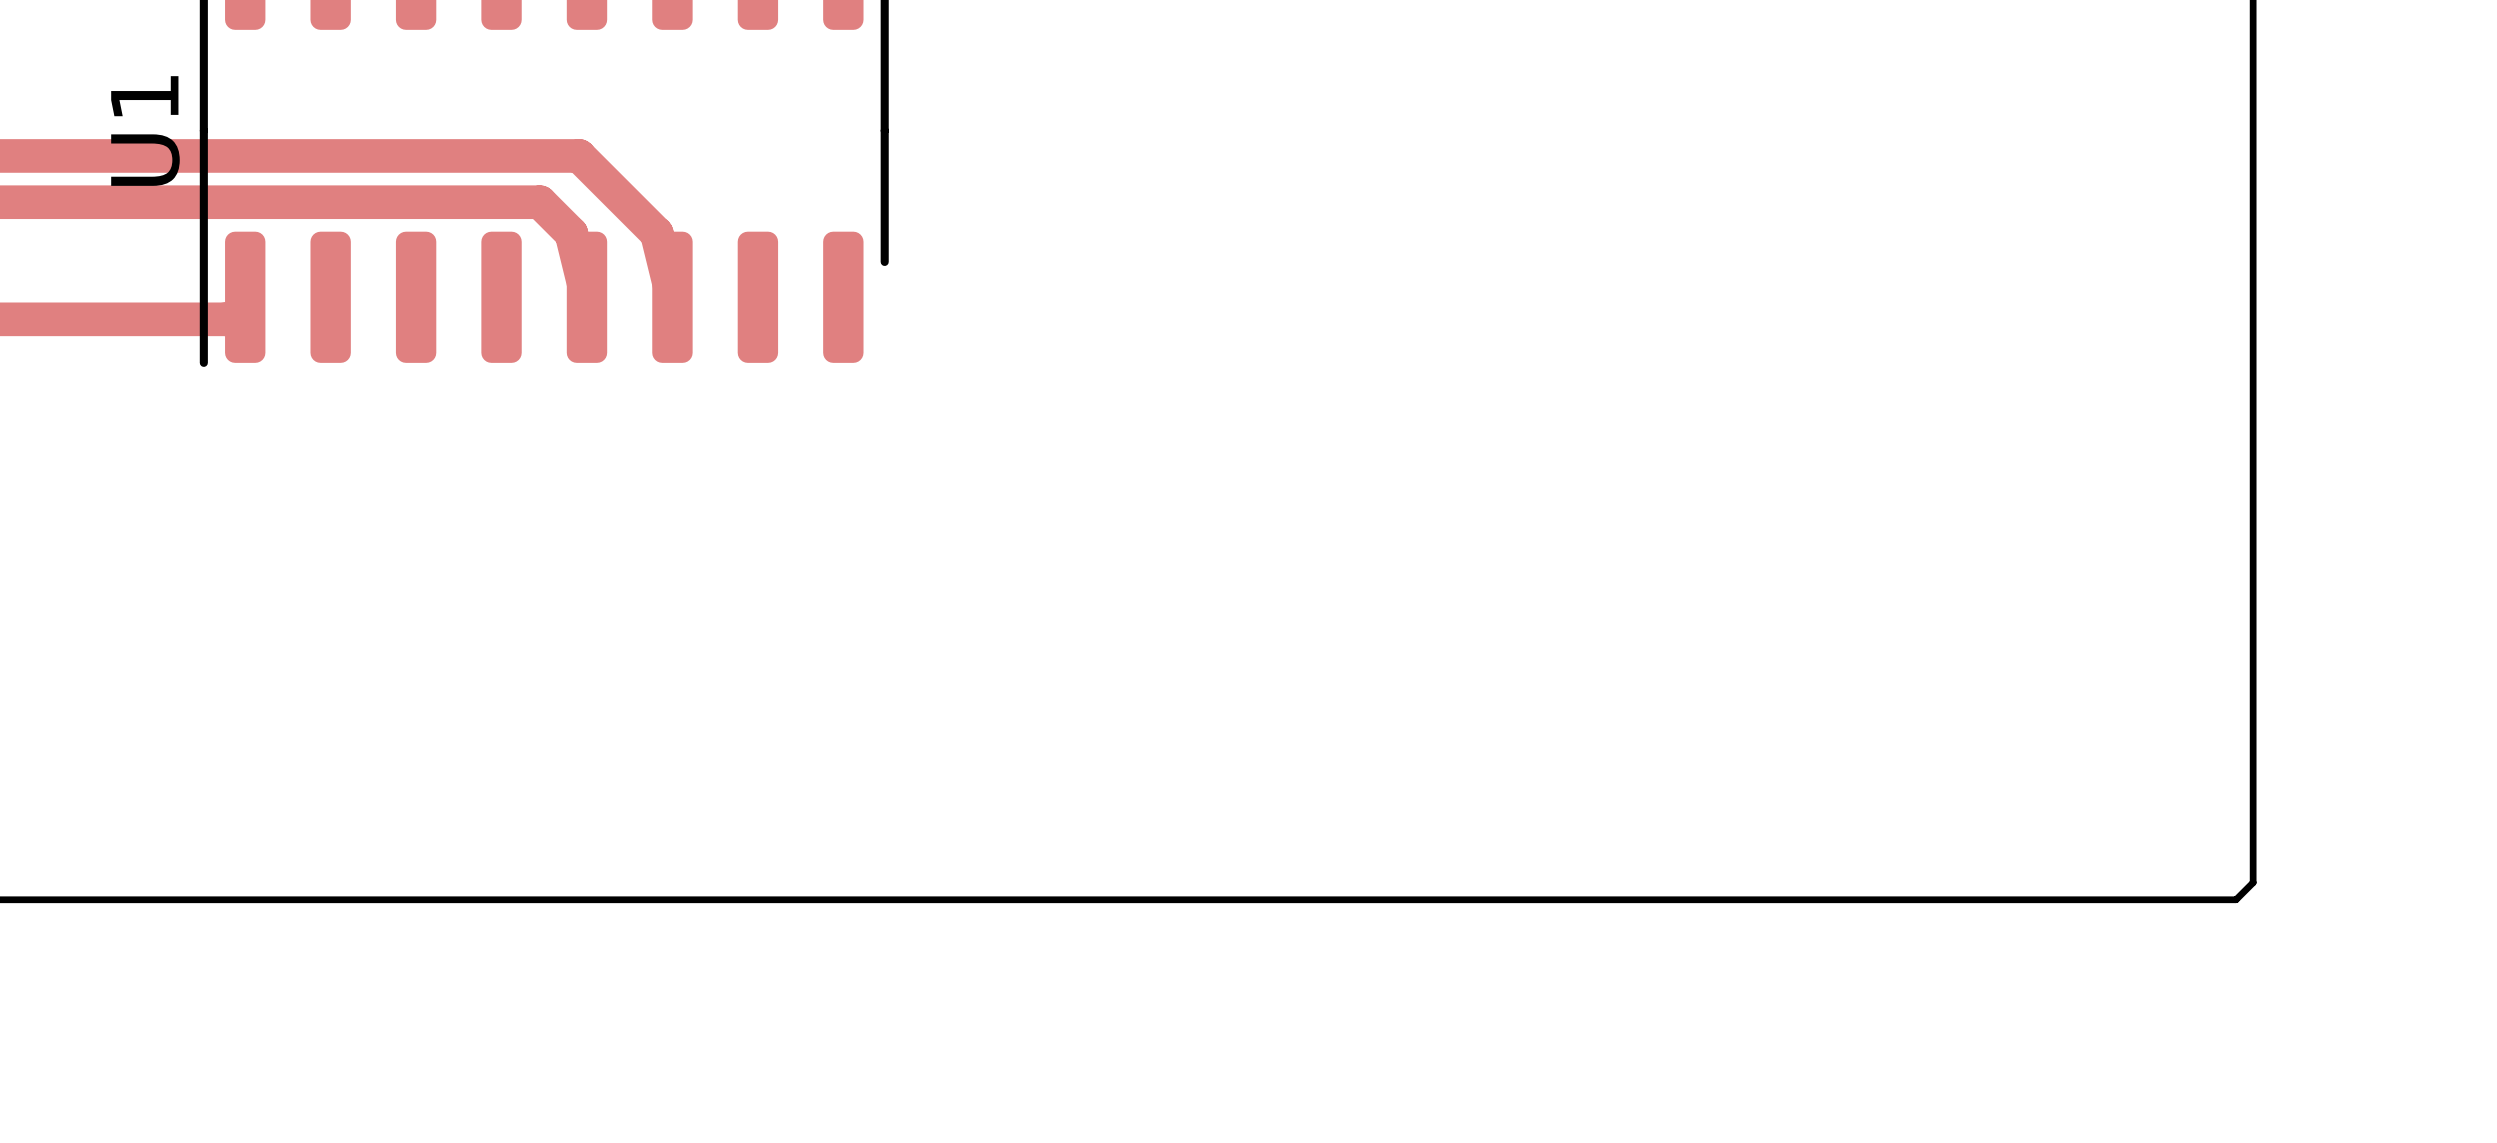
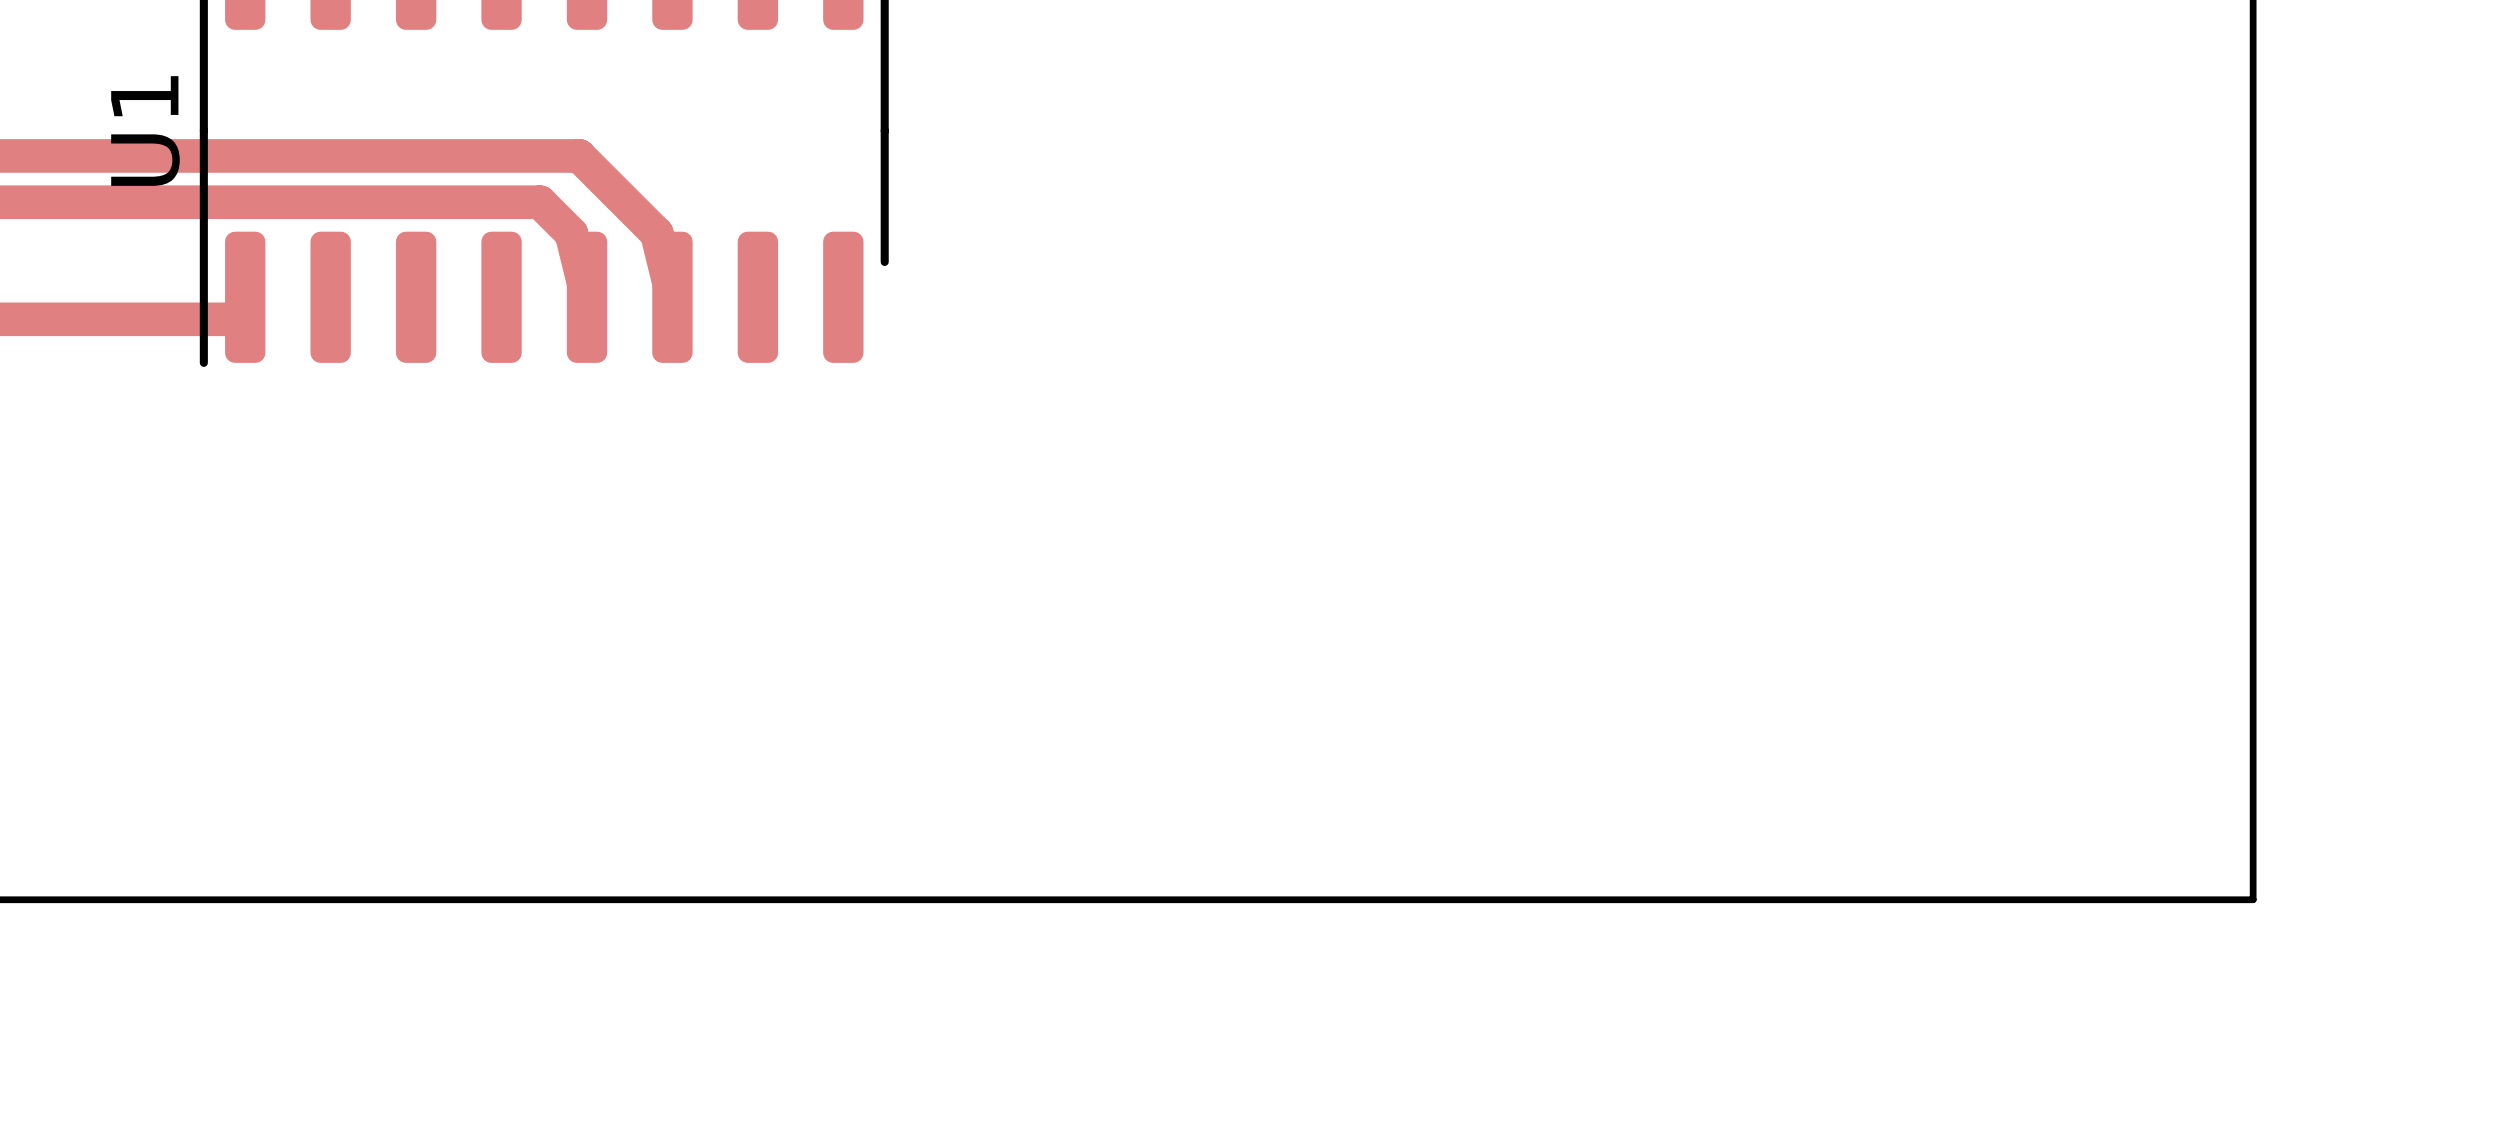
board edge: (2253, 882) (2236, 899) -> (2253, 882) (2253, 899) (2236, 899)

